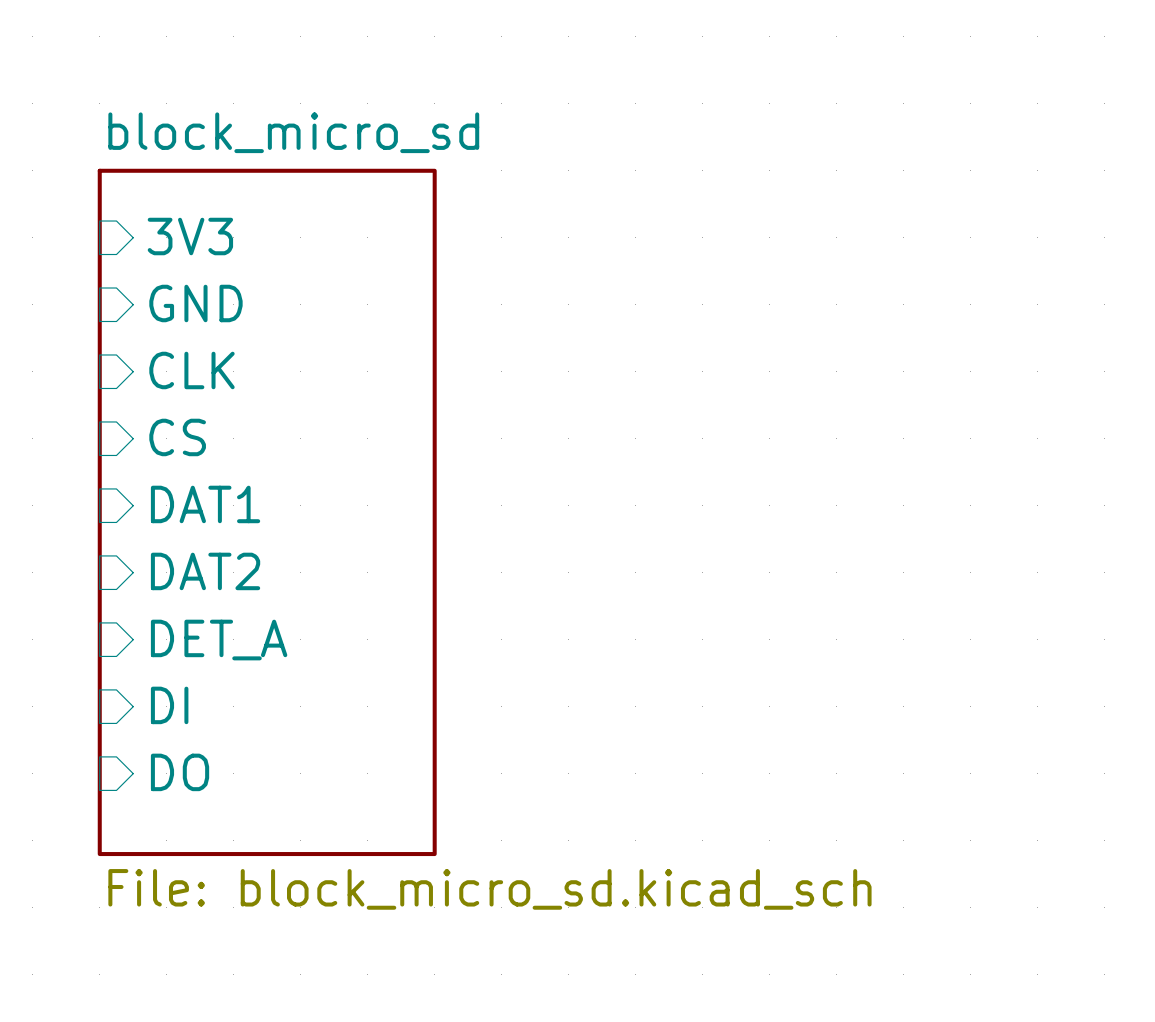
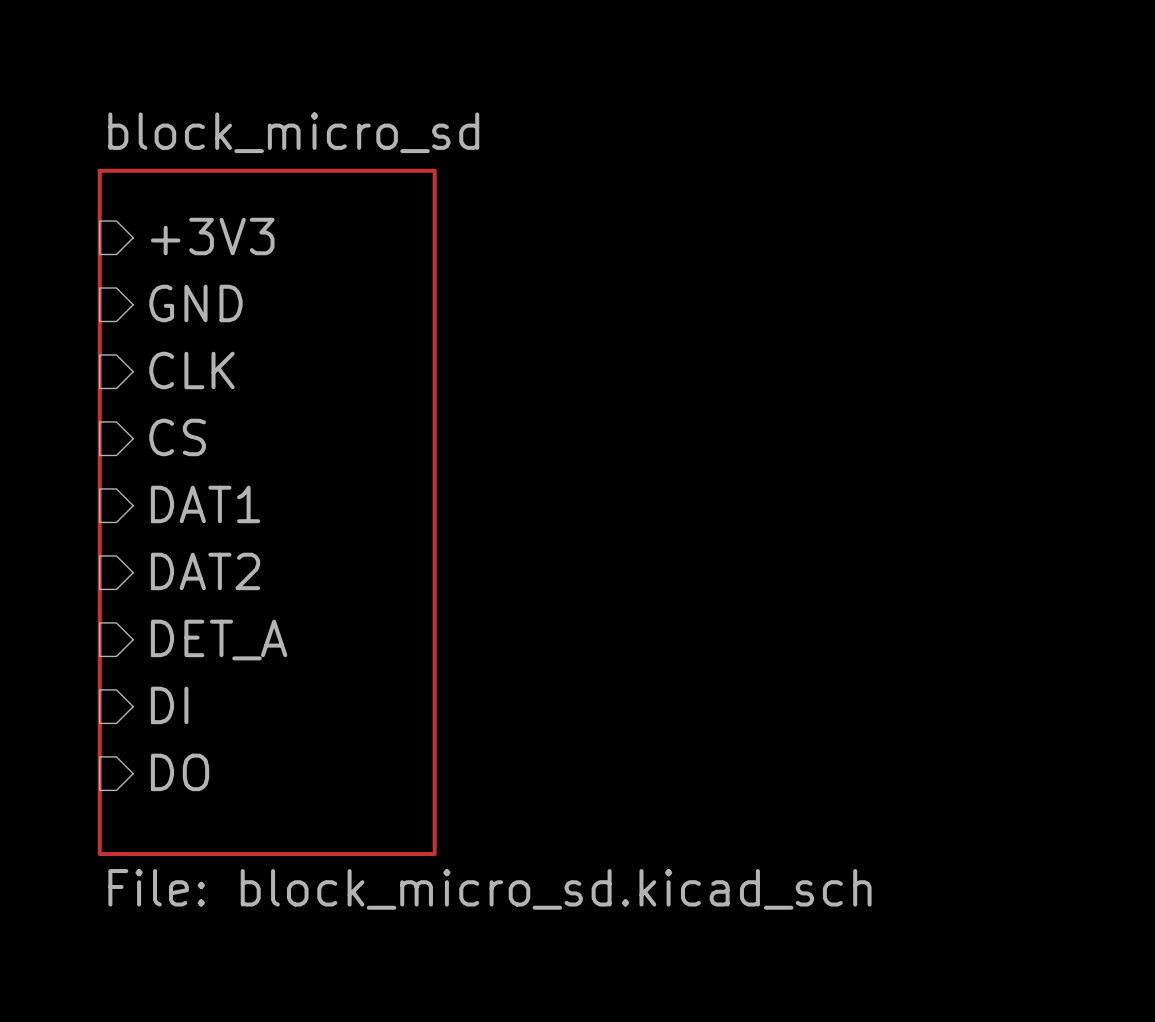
sheet pin: 3V3 (190, 236) -> +3V3 (212, 236)

